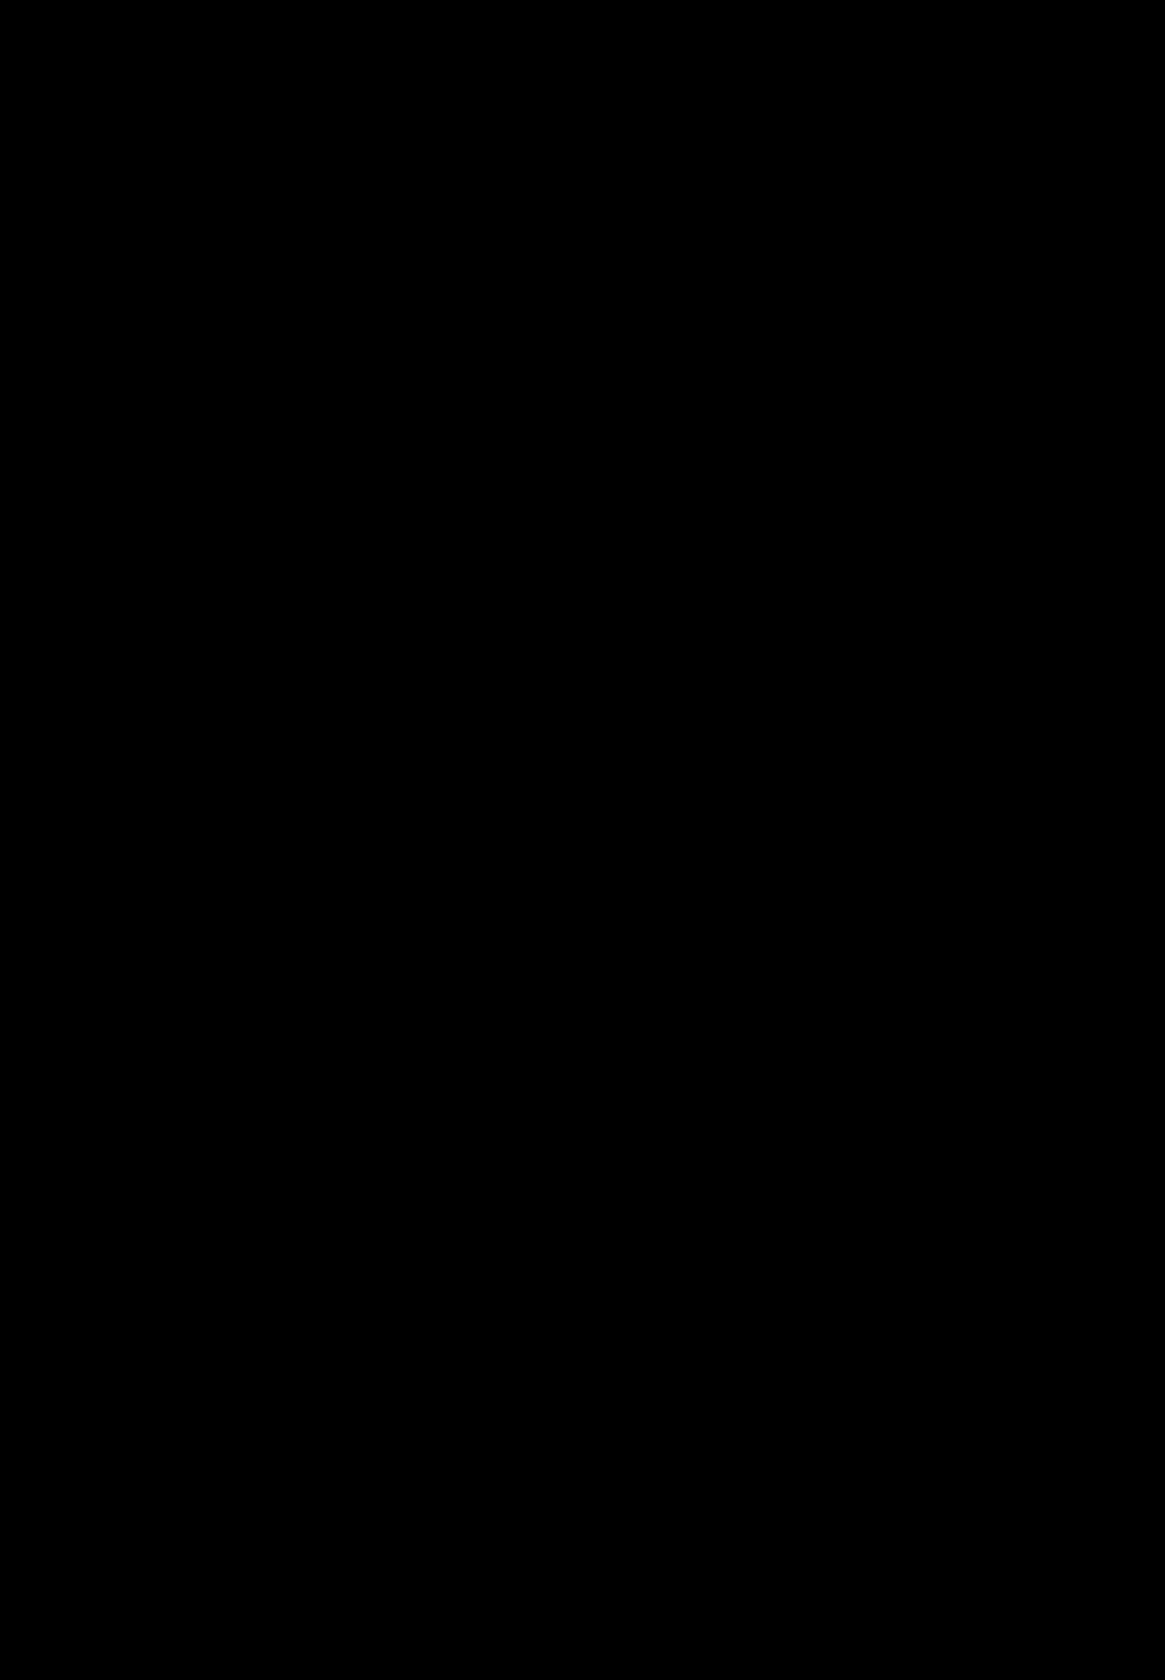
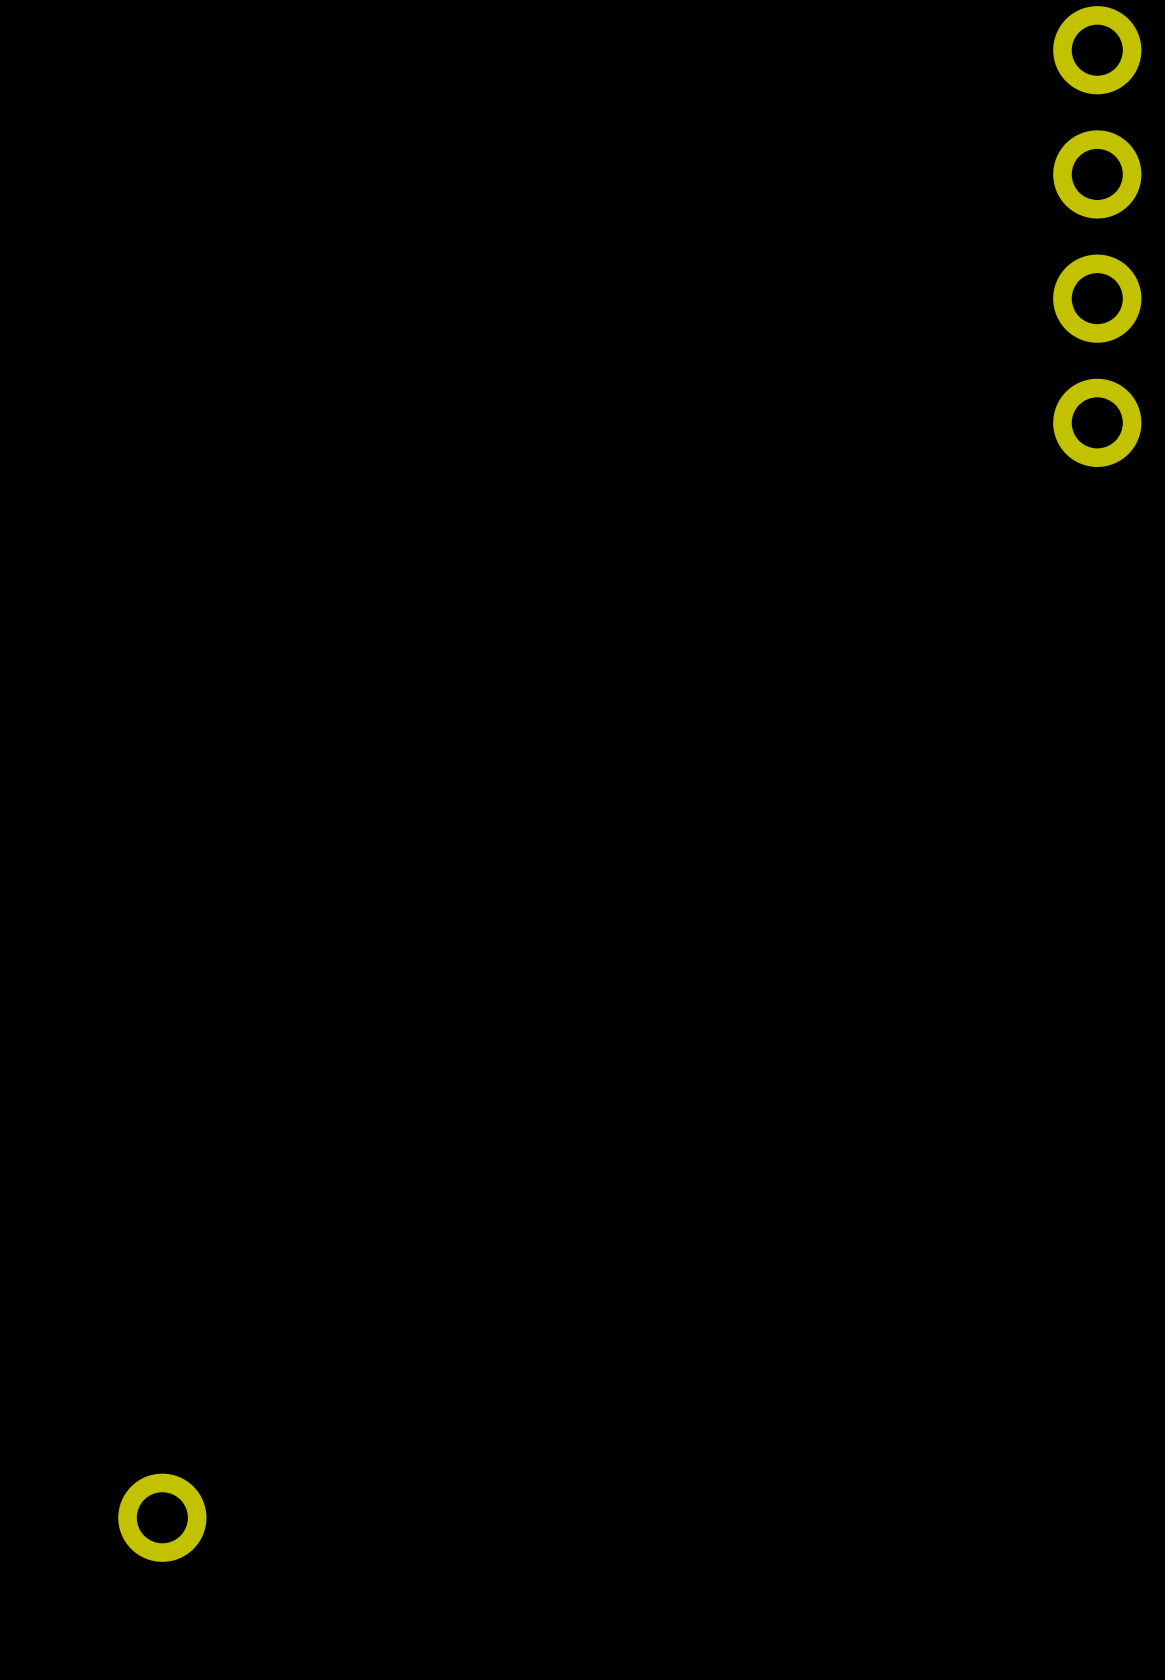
part: none -> (1097, 50)
part: none -> (1097, 174)
part: none -> (1097, 298)
part: none -> (1097, 422)
part: none -> (162, 1517)

